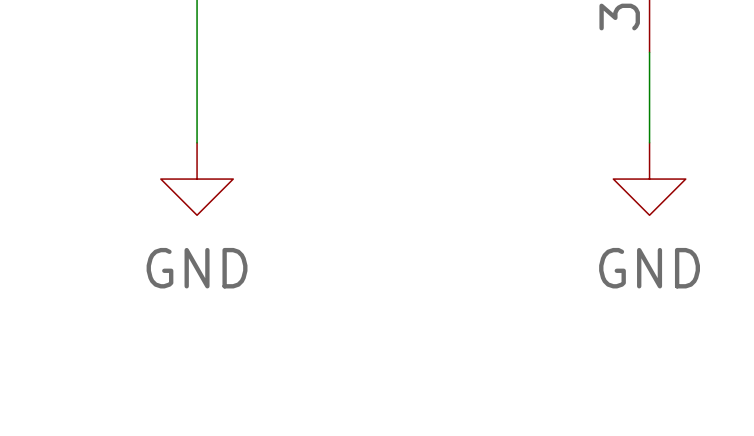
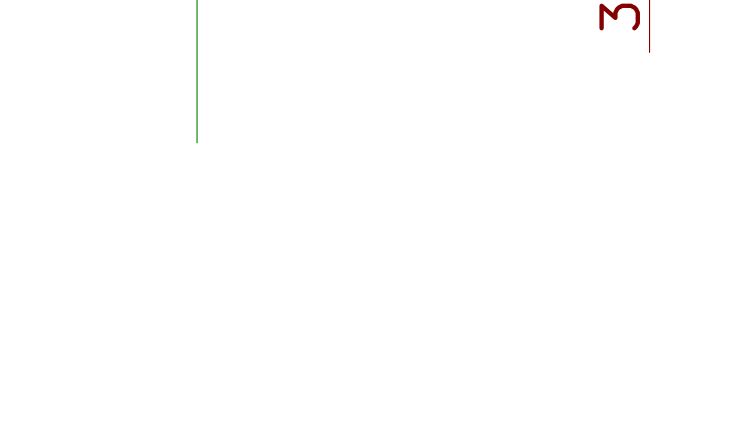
wire: (649, 52) (649, 142) -> none
power symbol: GND (197, 179) -> none
power symbol: GND (649, 179) -> none

